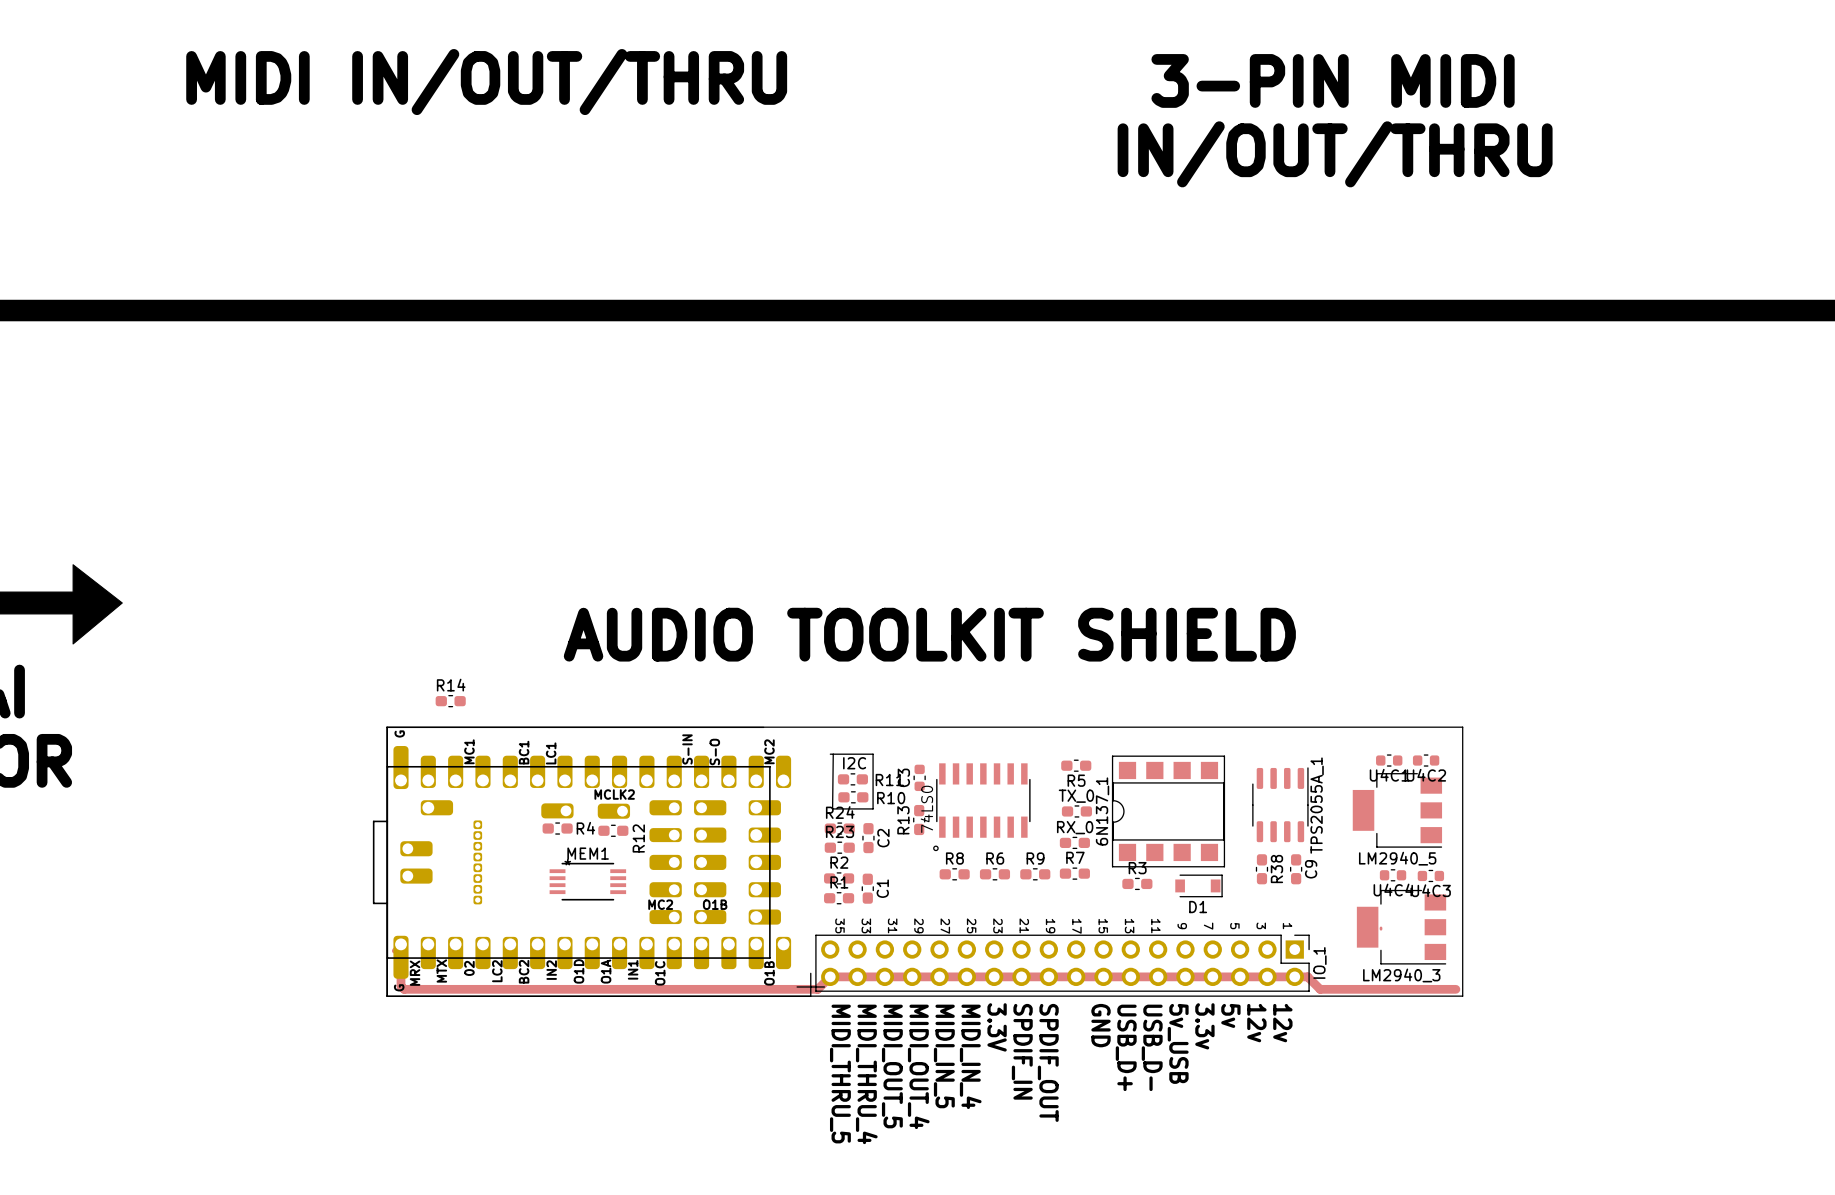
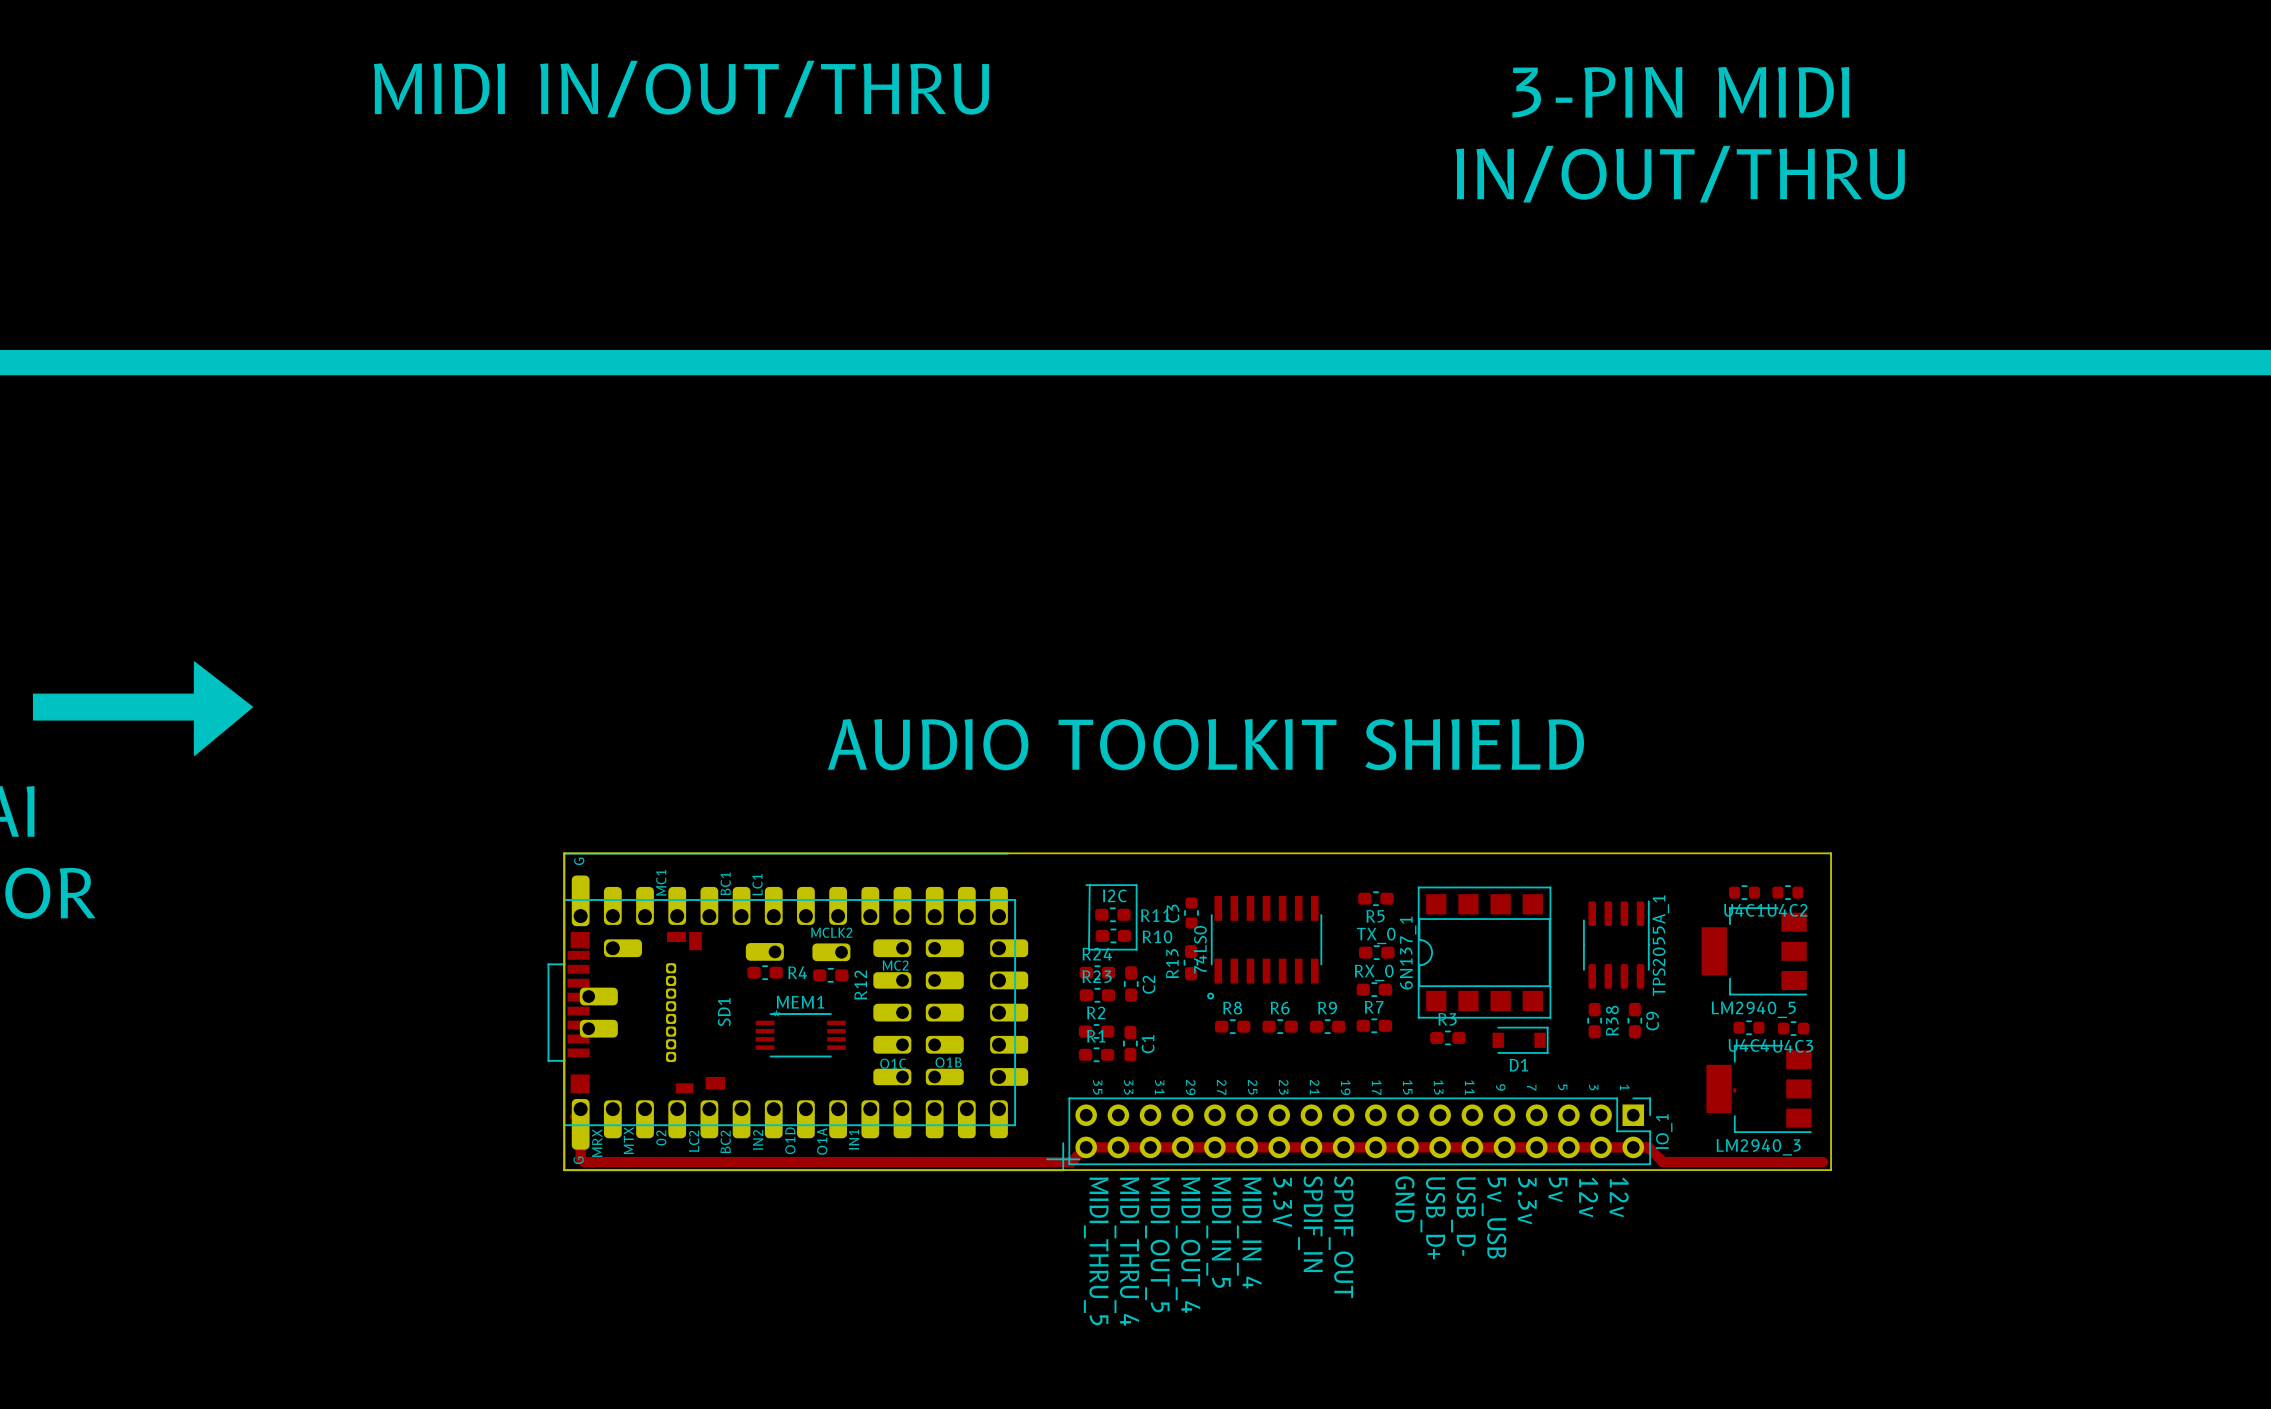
R14: (450, 701) -> none
part footprint: [372, 726, 826, 997] -> [547, 852, 1081, 1172]
SD1: none -> (646, 1012)

